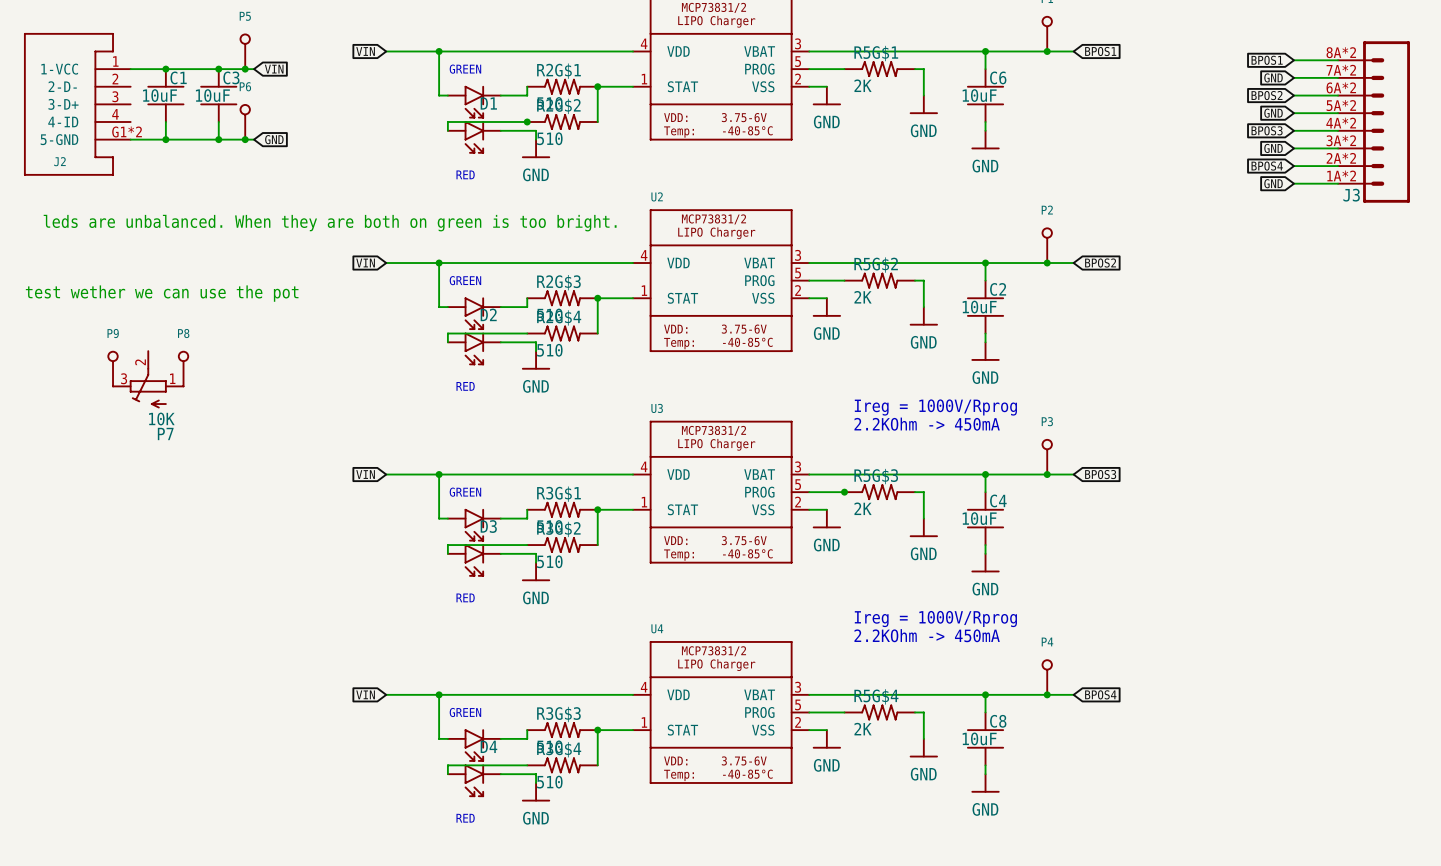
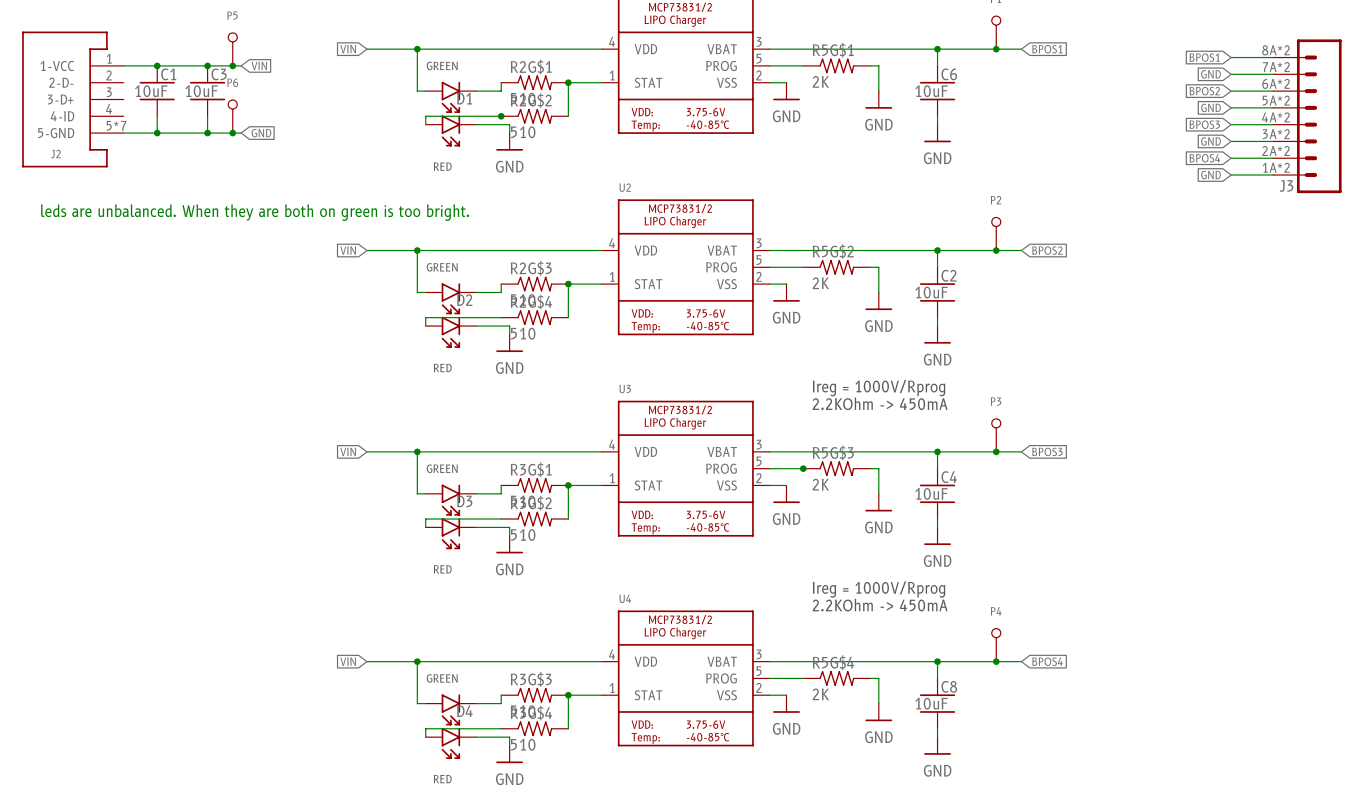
J2 pin number: G1*2 (127, 131) -> 5*7 (116, 125)
text: test wether we can use the pot (162, 293) -> none
P9: (113, 369) -> none
P8: (183, 369) -> none
P7: 10K (148, 379) -> none

